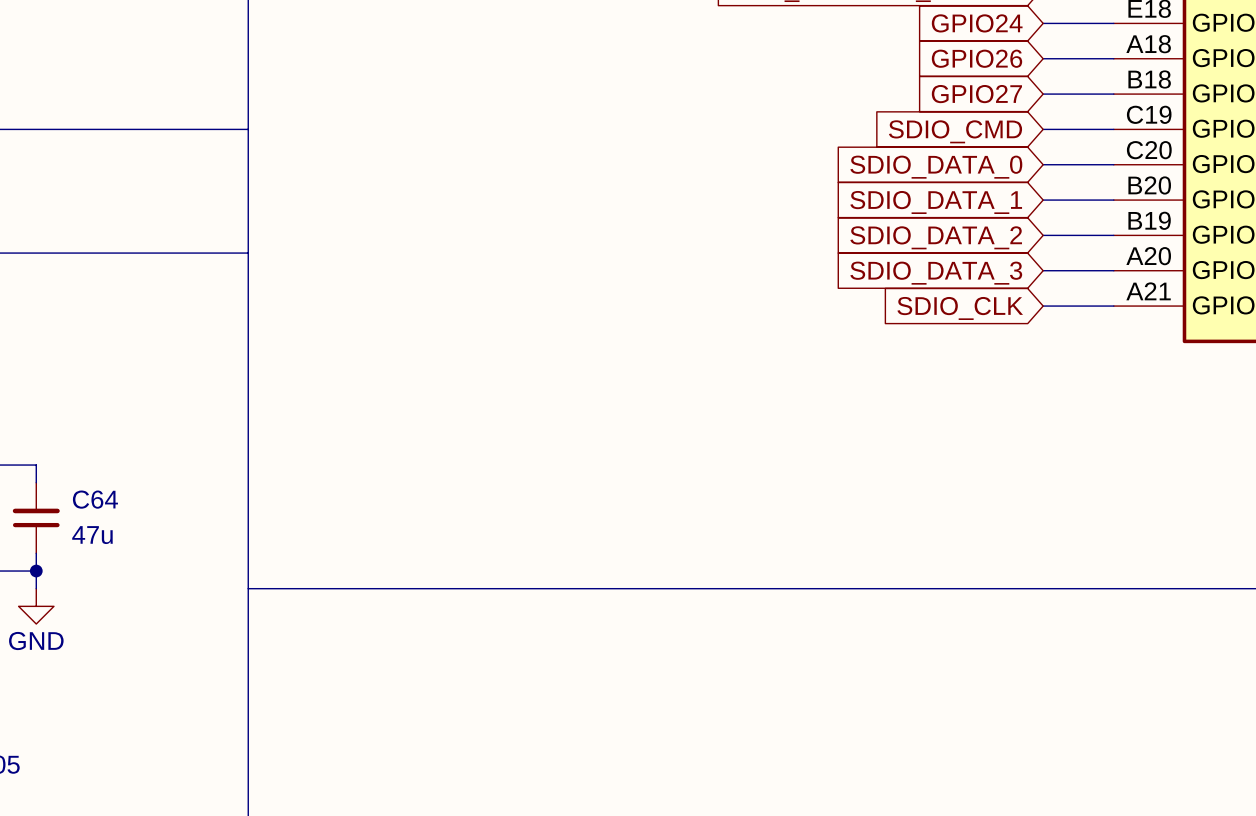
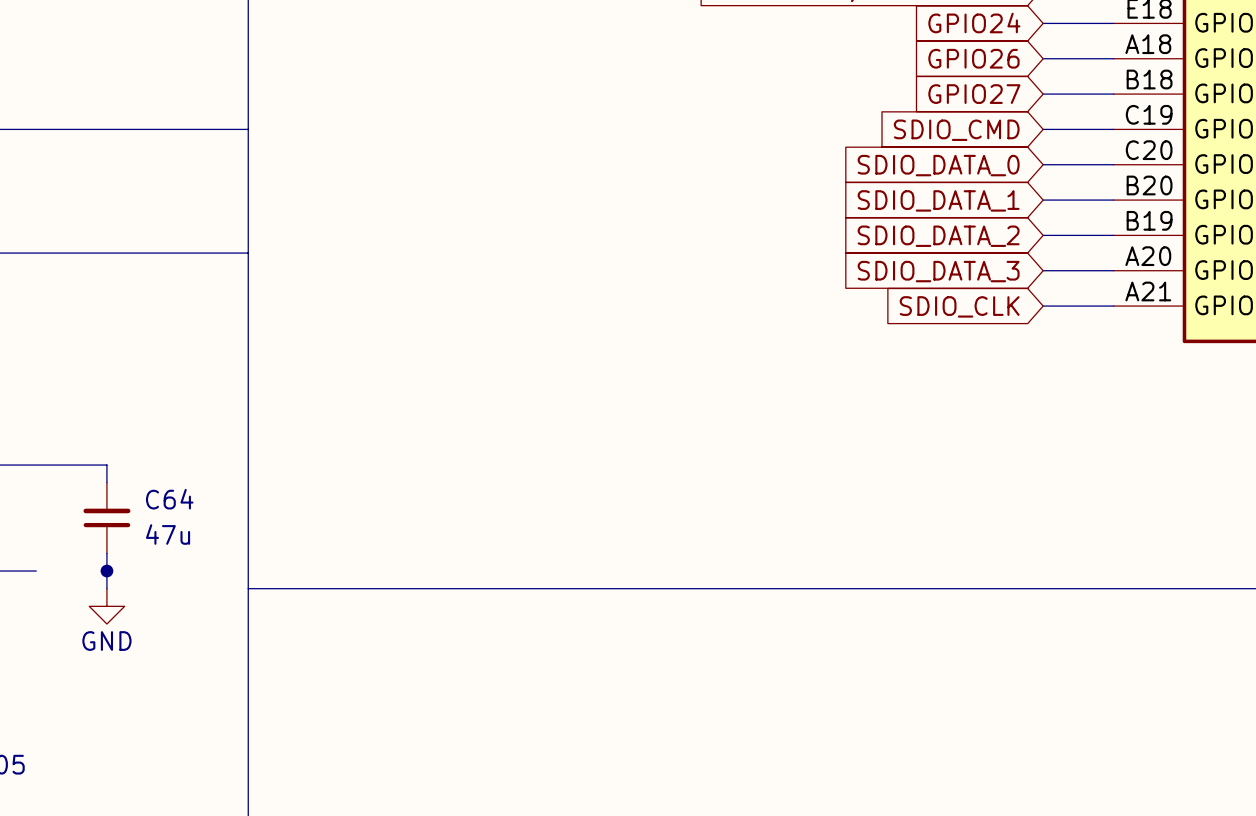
wire: (36, 465) (36, 482) -> (36, 465) (106, 465) (106, 482)
C64 position: (36, 518) -> (106, 518)
wire: (36, 553) (36, 588) -> (106, 553) (106, 588)
junction: (36, 571) -> none
junction: none -> (106, 571)
power symbol position: GND (36, 606) -> GND (106, 606)

